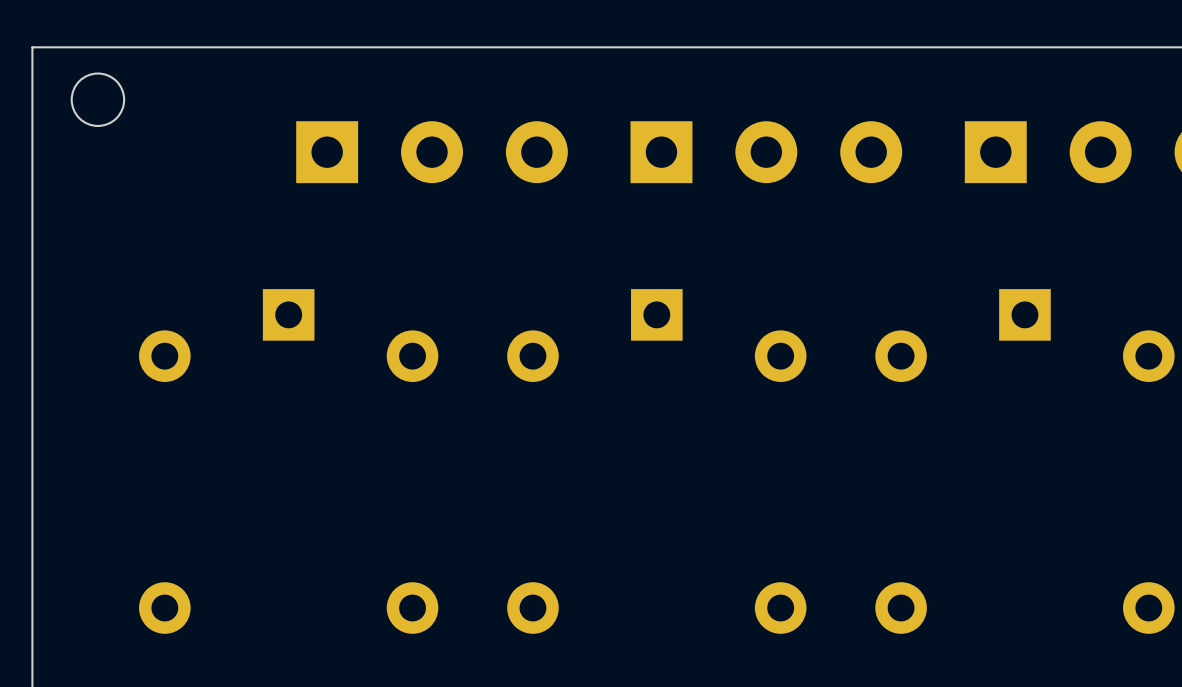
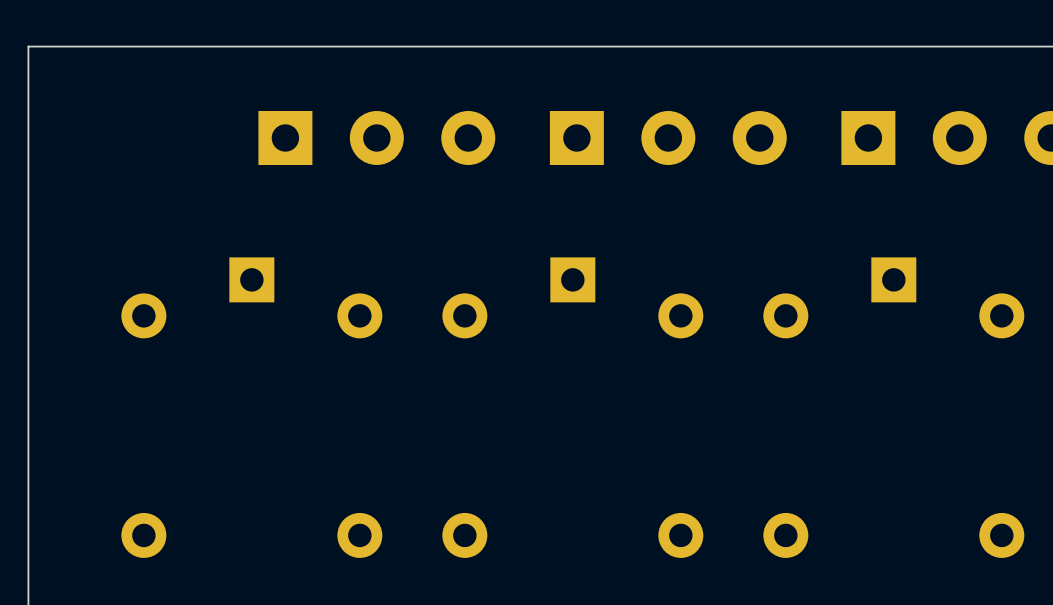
round board edge: [70, 72, 126, 127] -> none

